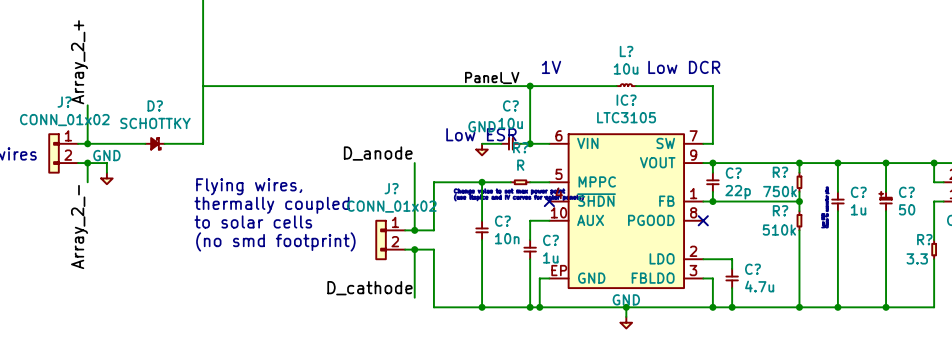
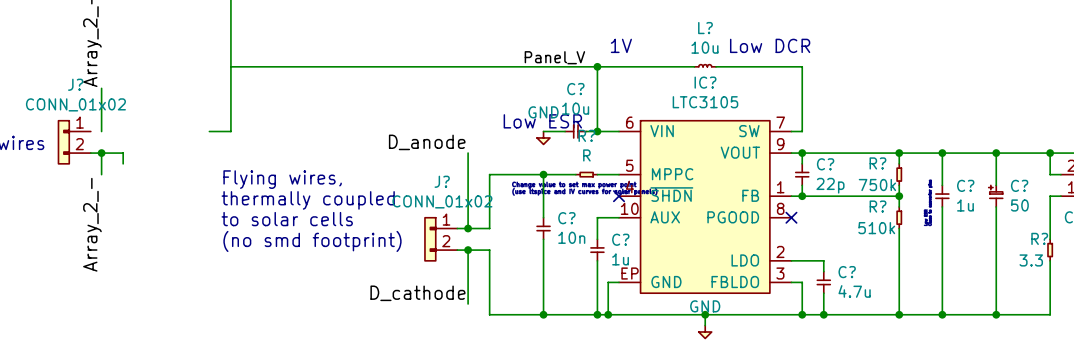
wire: (78, 143) (145, 143) -> none
junction: (87, 143) -> none
D?: SCHOTTKY (155, 143) -> none
wire: (164, 143) (183, 143) -> none
power symbol: GND (106, 178) -> none

